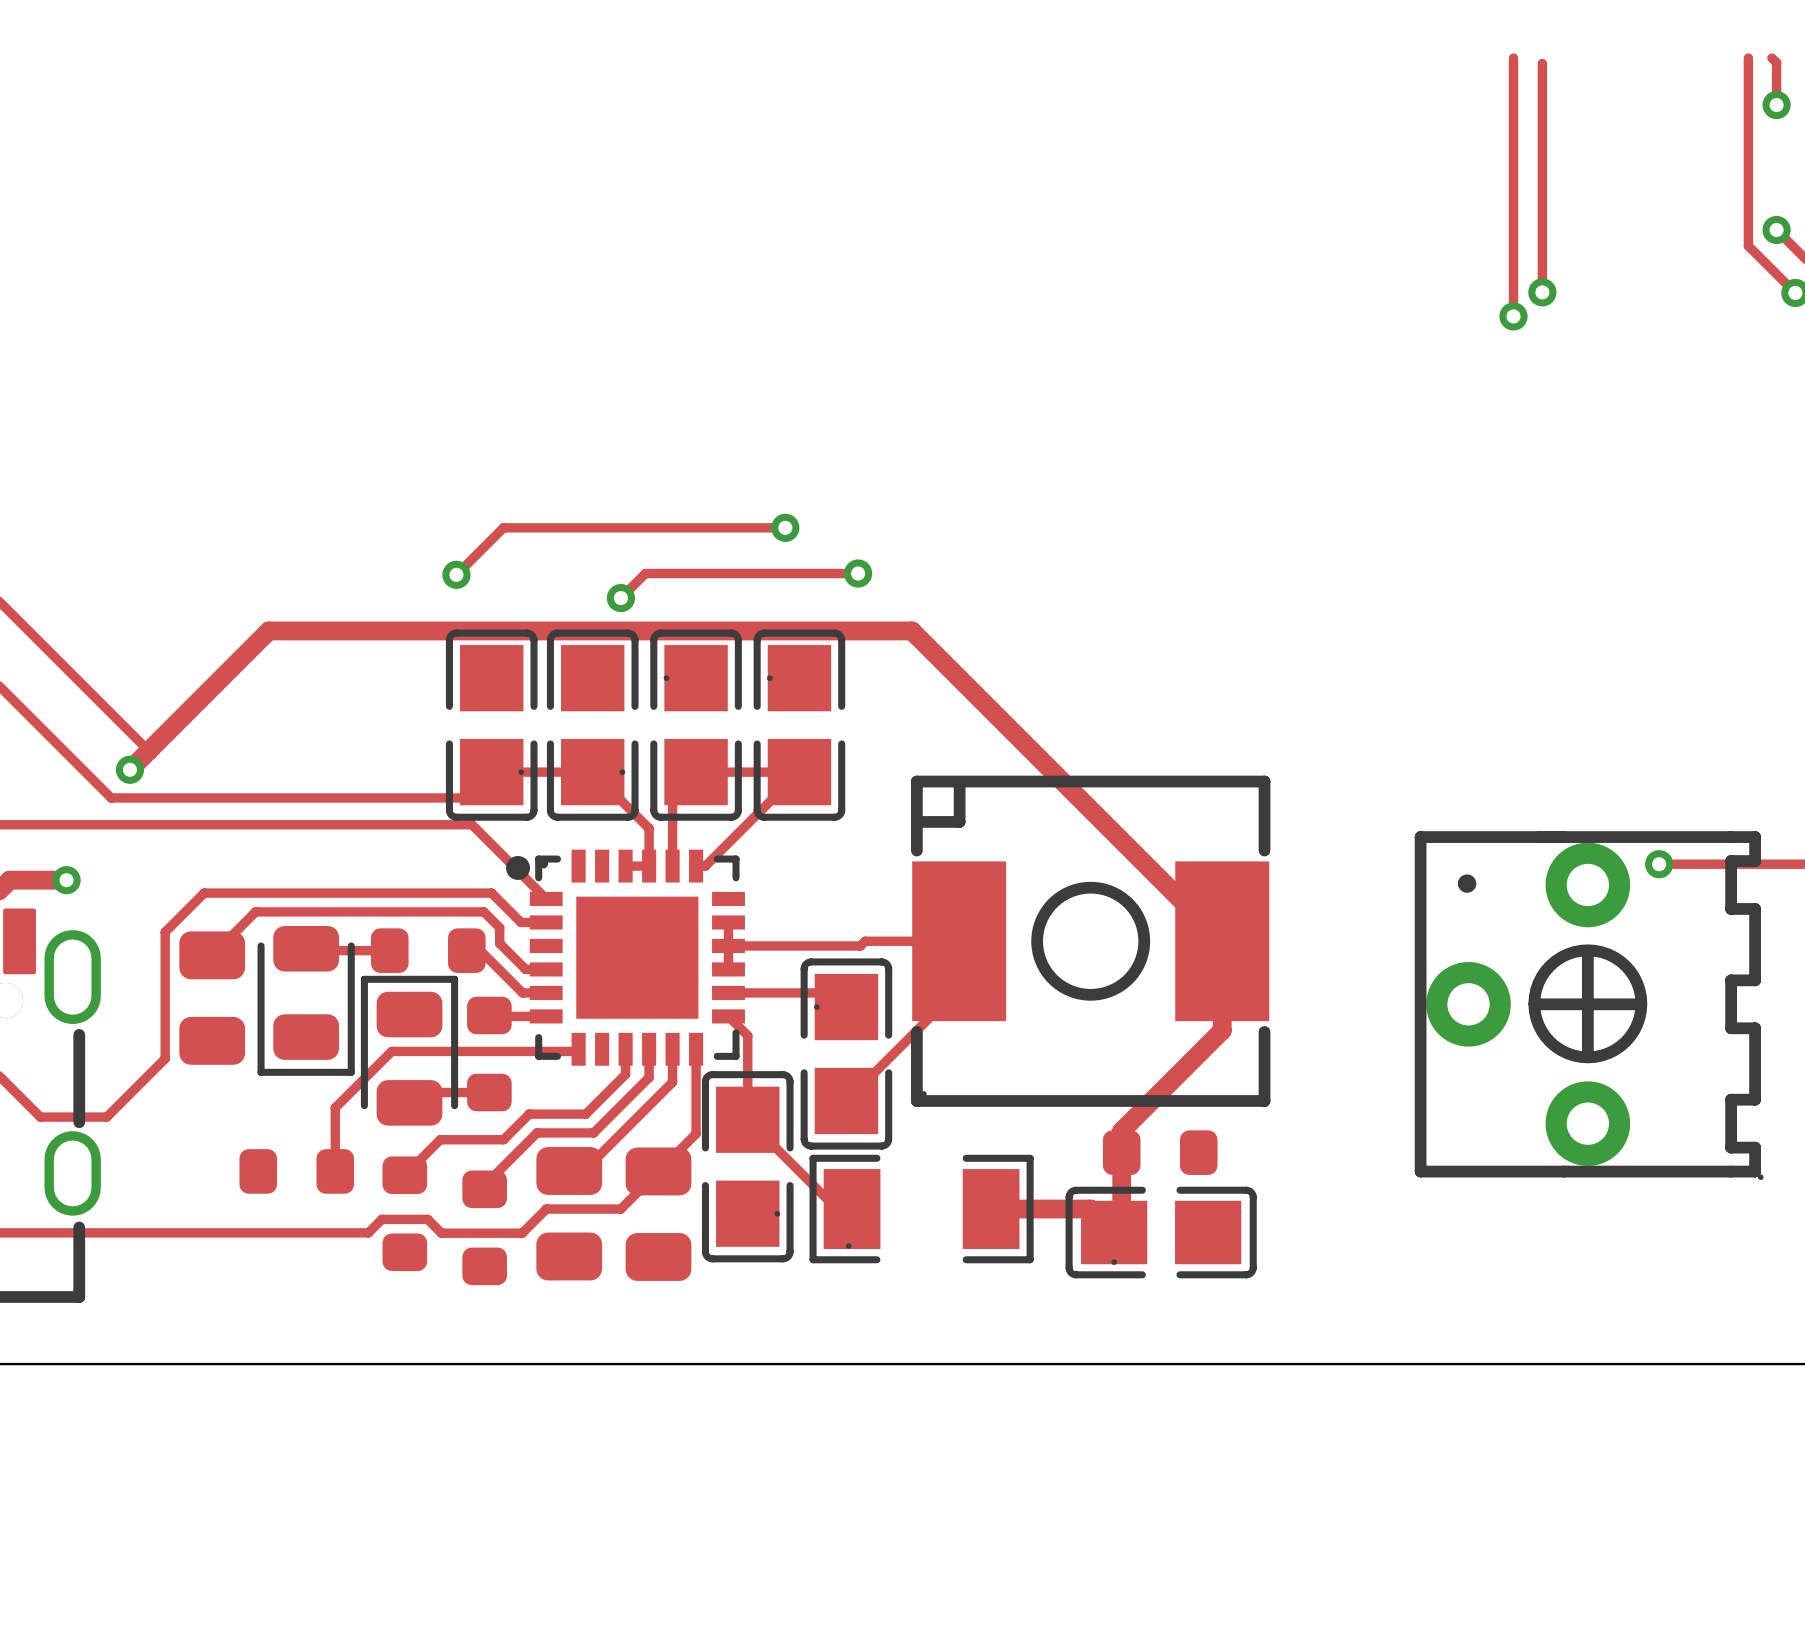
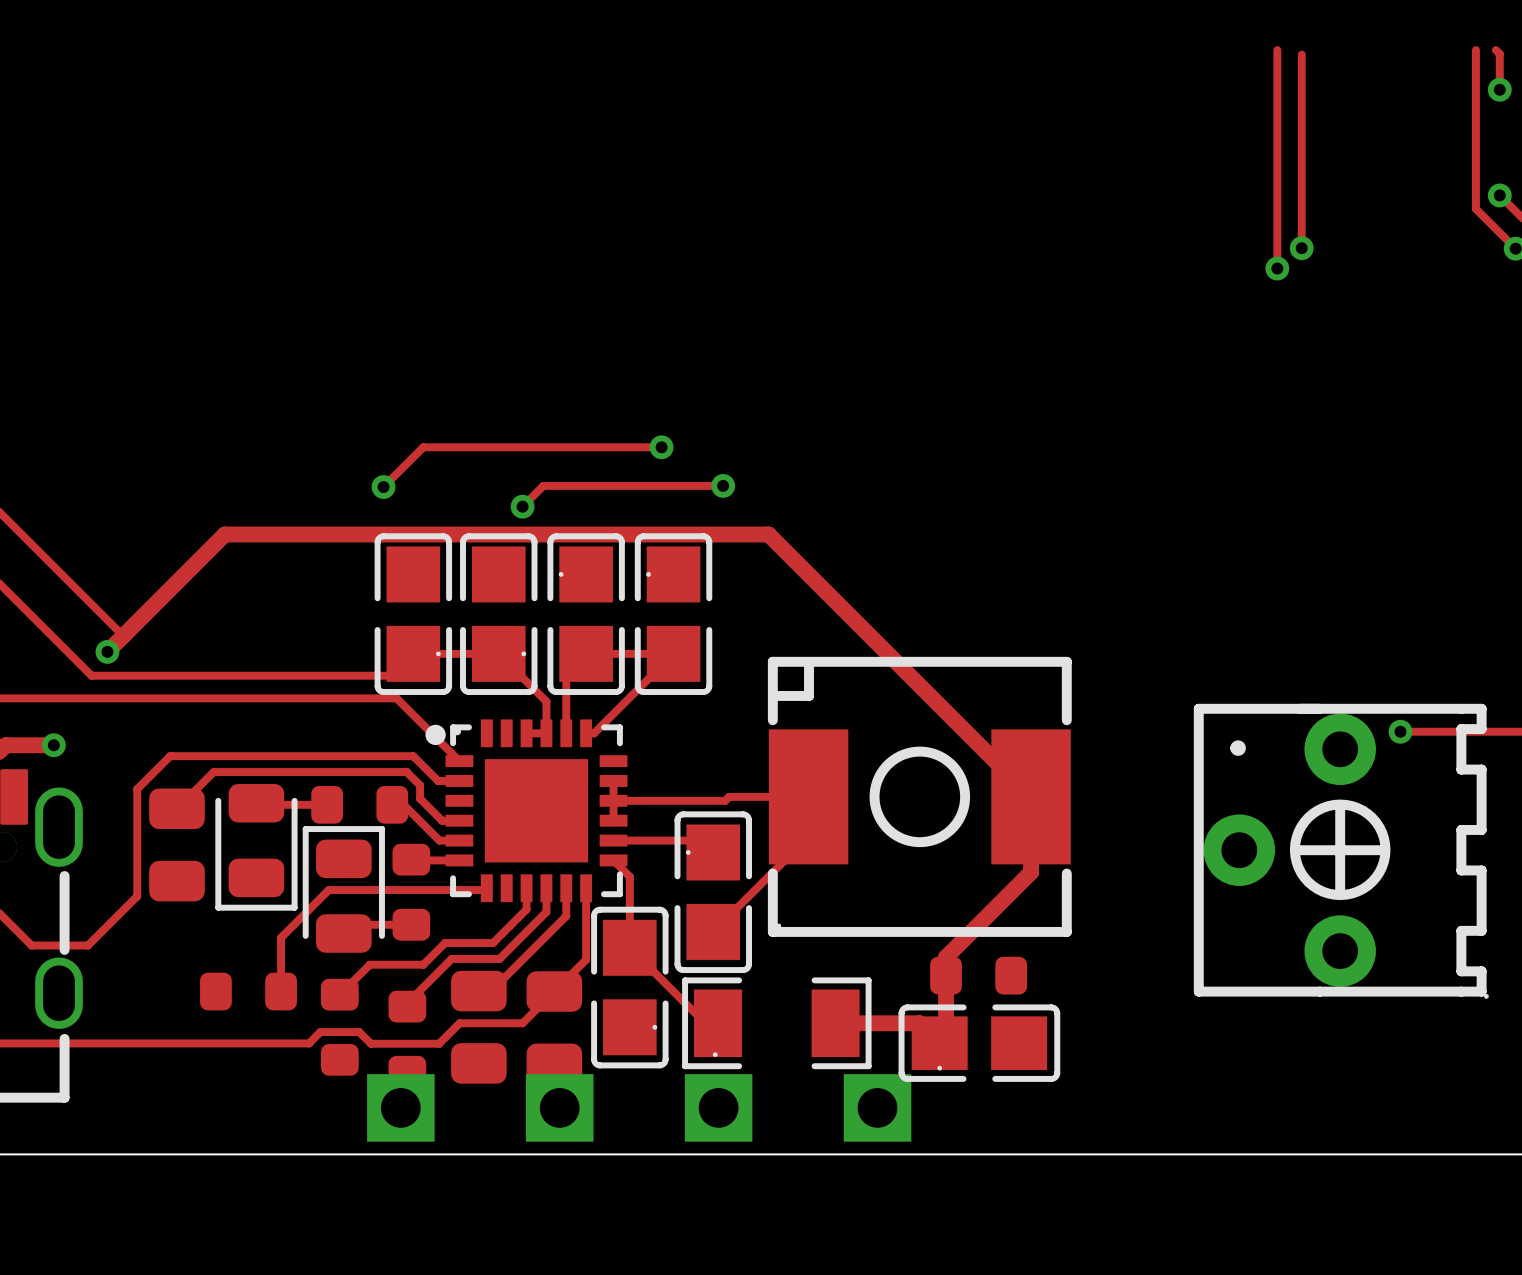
part: none -> (400, 1107)
part: none -> (559, 1107)
part: none -> (718, 1107)
part: none -> (877, 1107)

